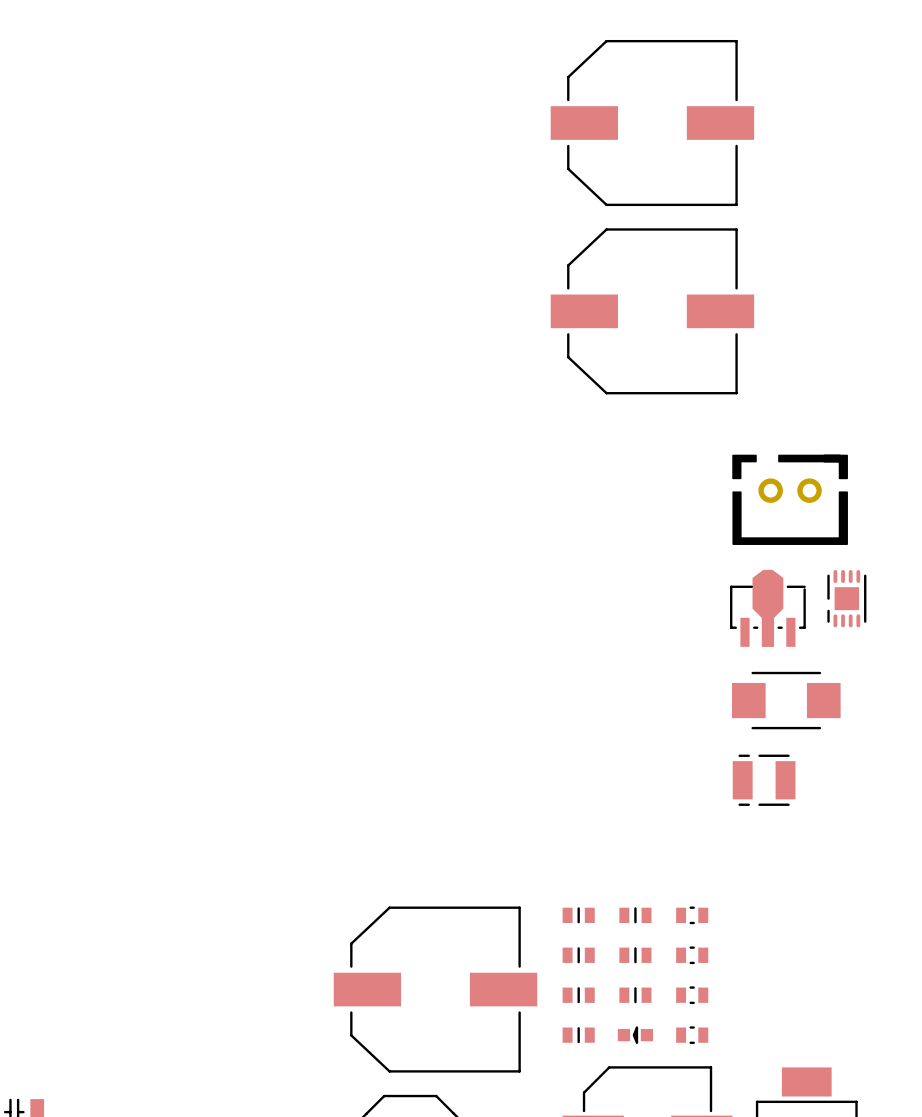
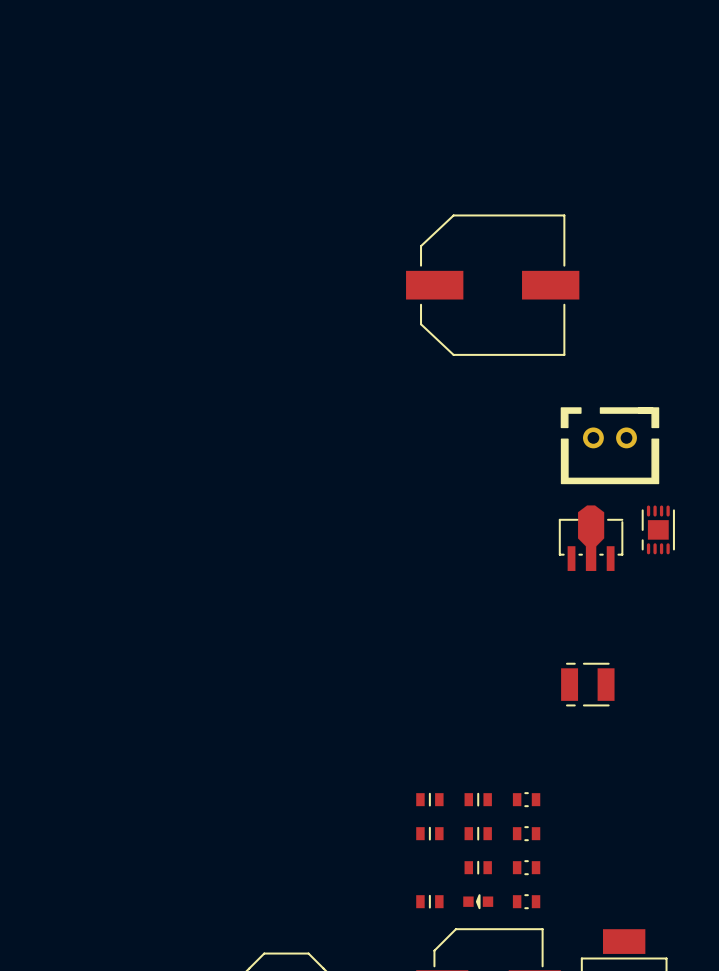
part: (652, 123) -> none
part: (786, 700) -> none
part: (435, 989) -> none
part: (578, 995) -> none

